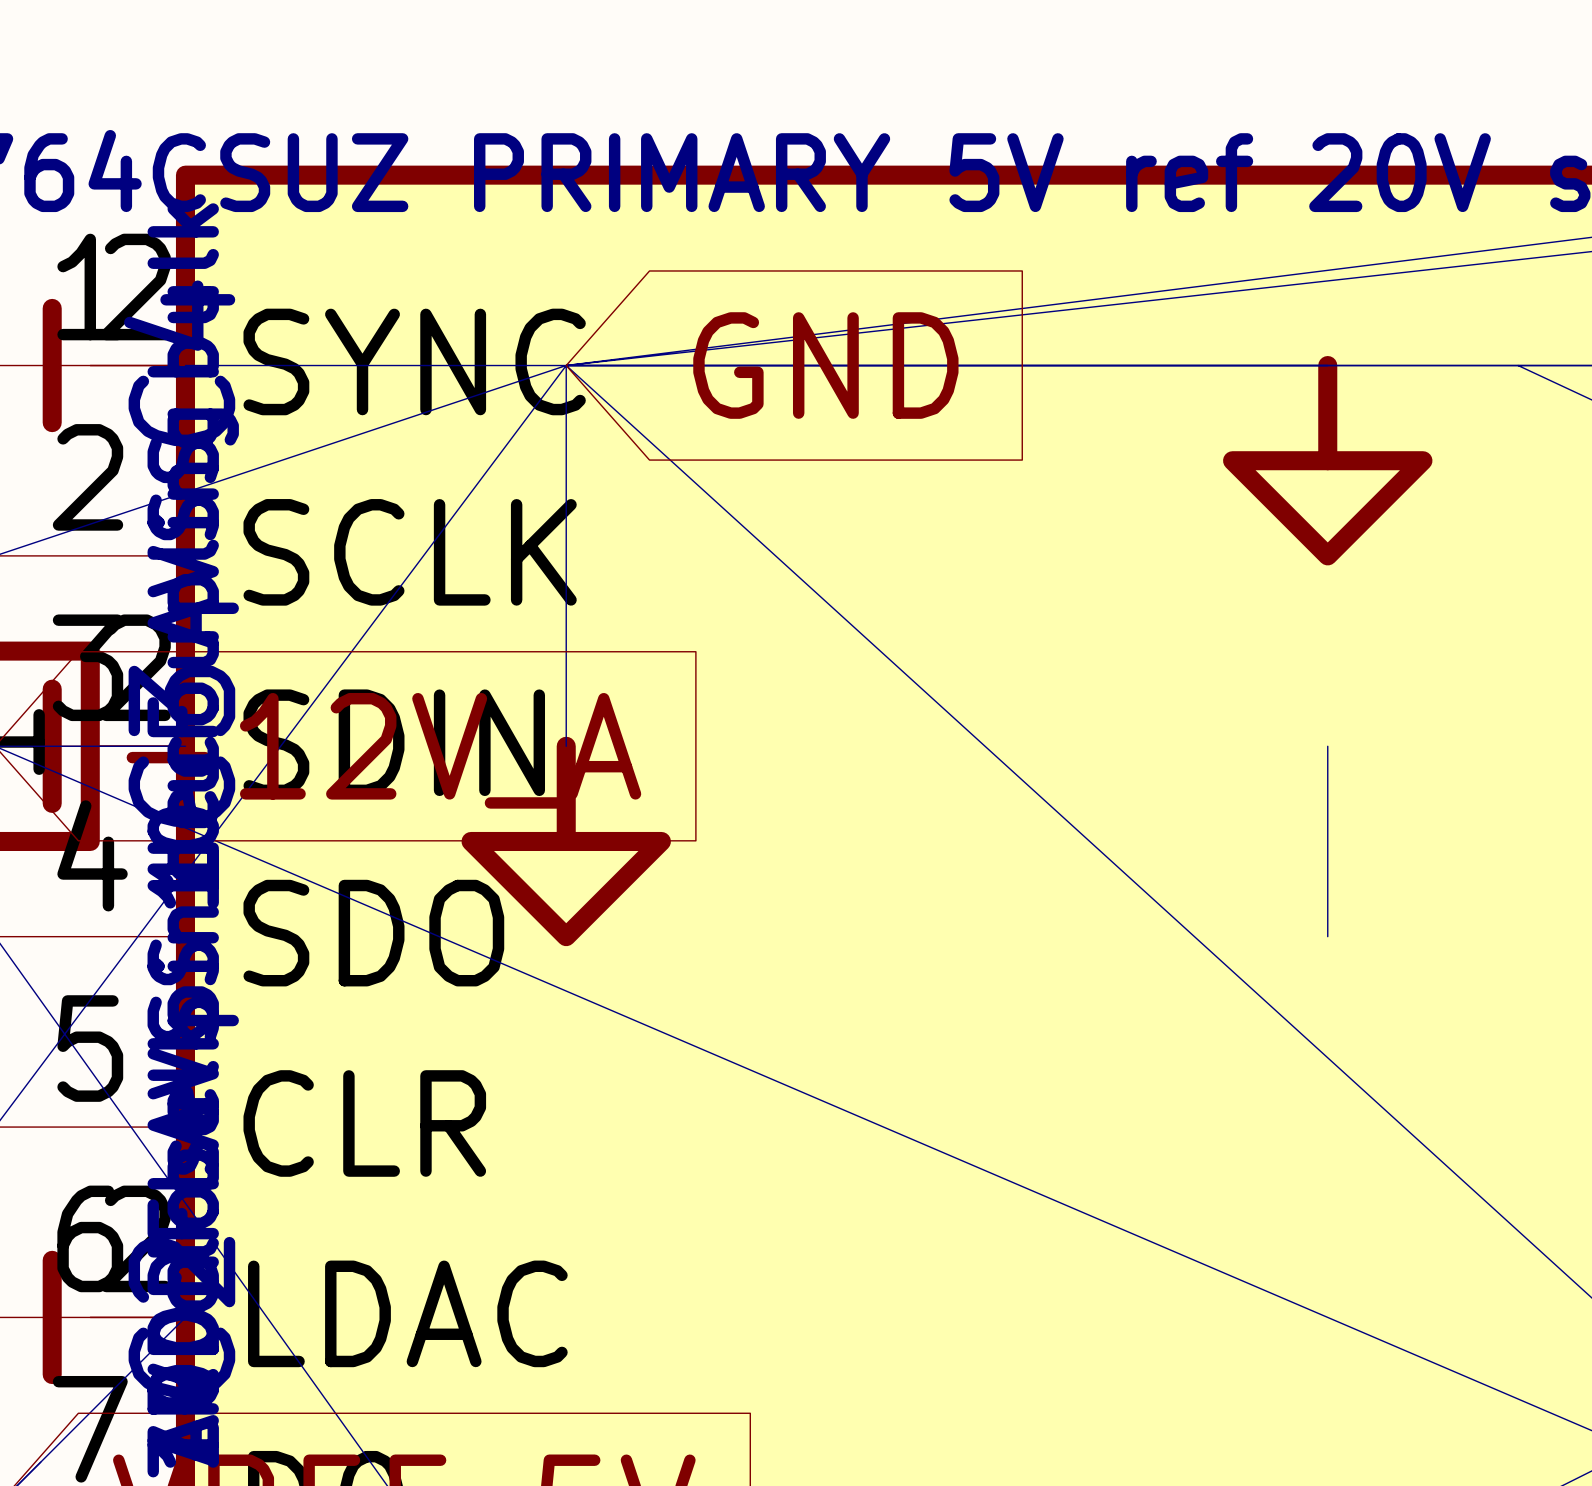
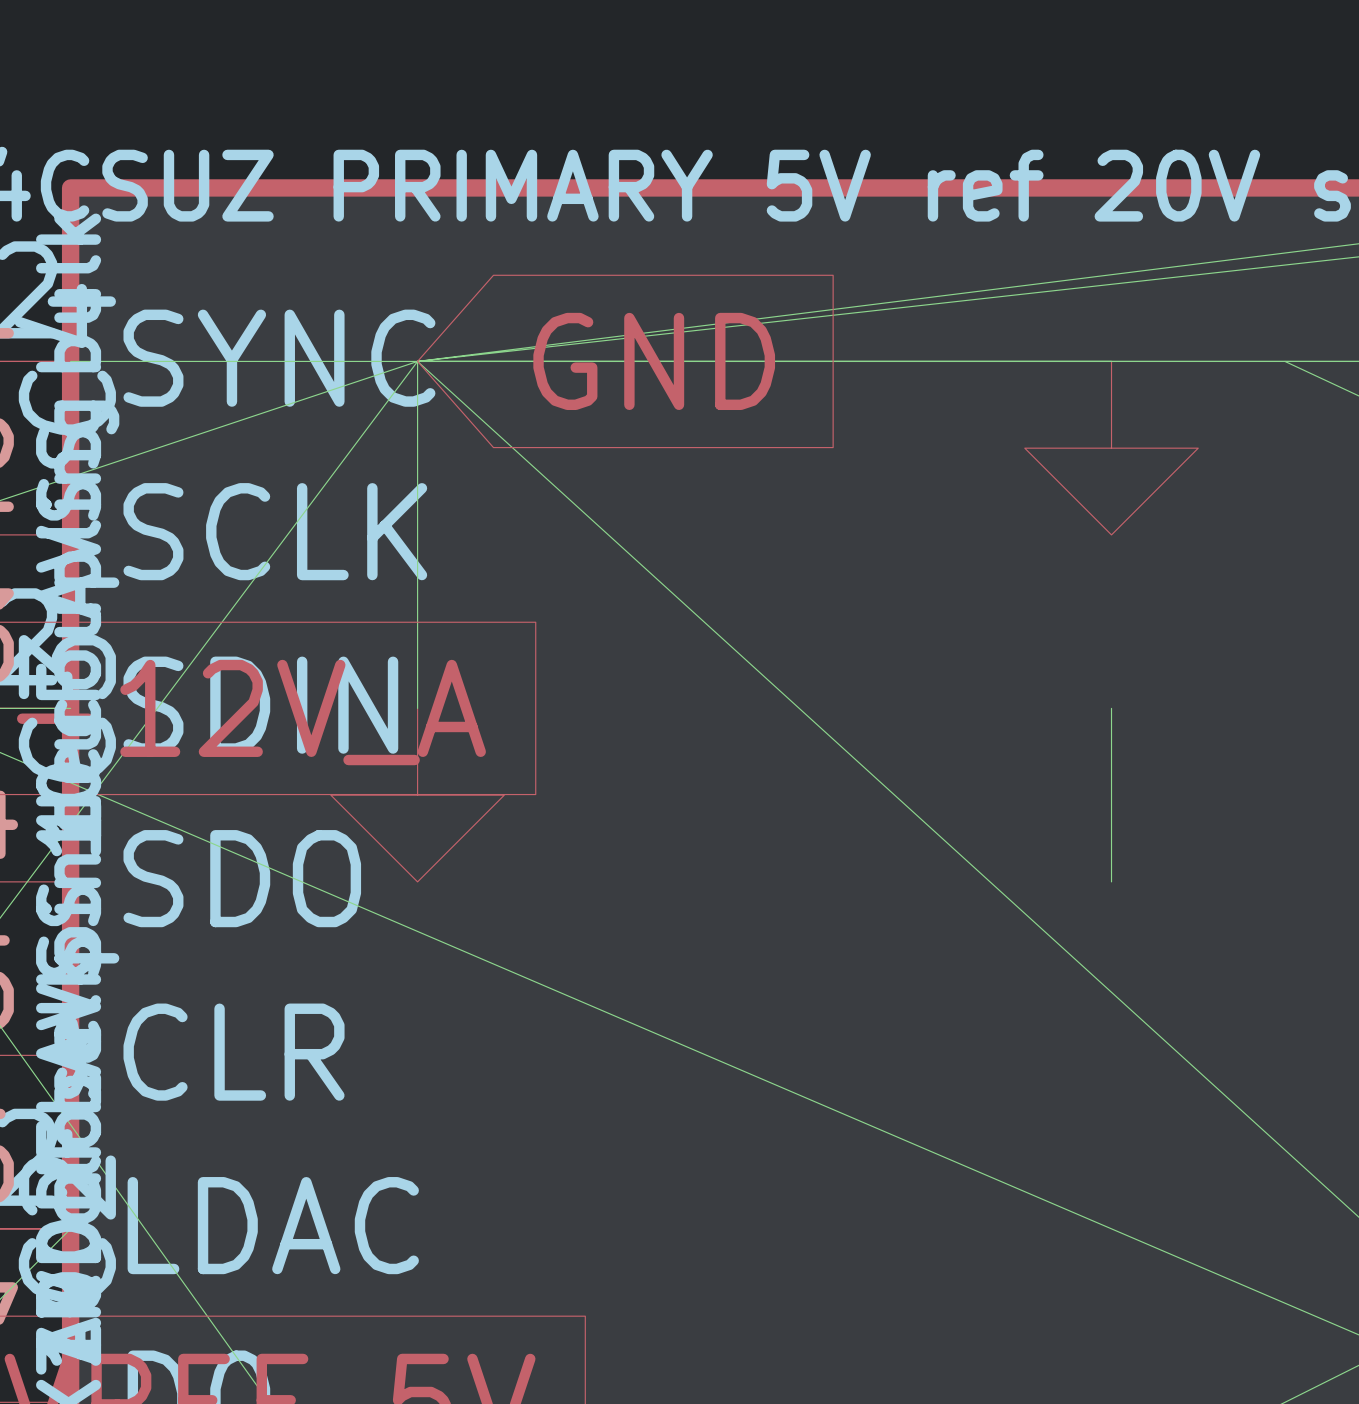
power symbol shape: [1223, 356, 1433, 566] -> [1024, 361, 1199, 535]
power symbol shape: [461, 736, 671, 947] -> [330, 708, 505, 882]

